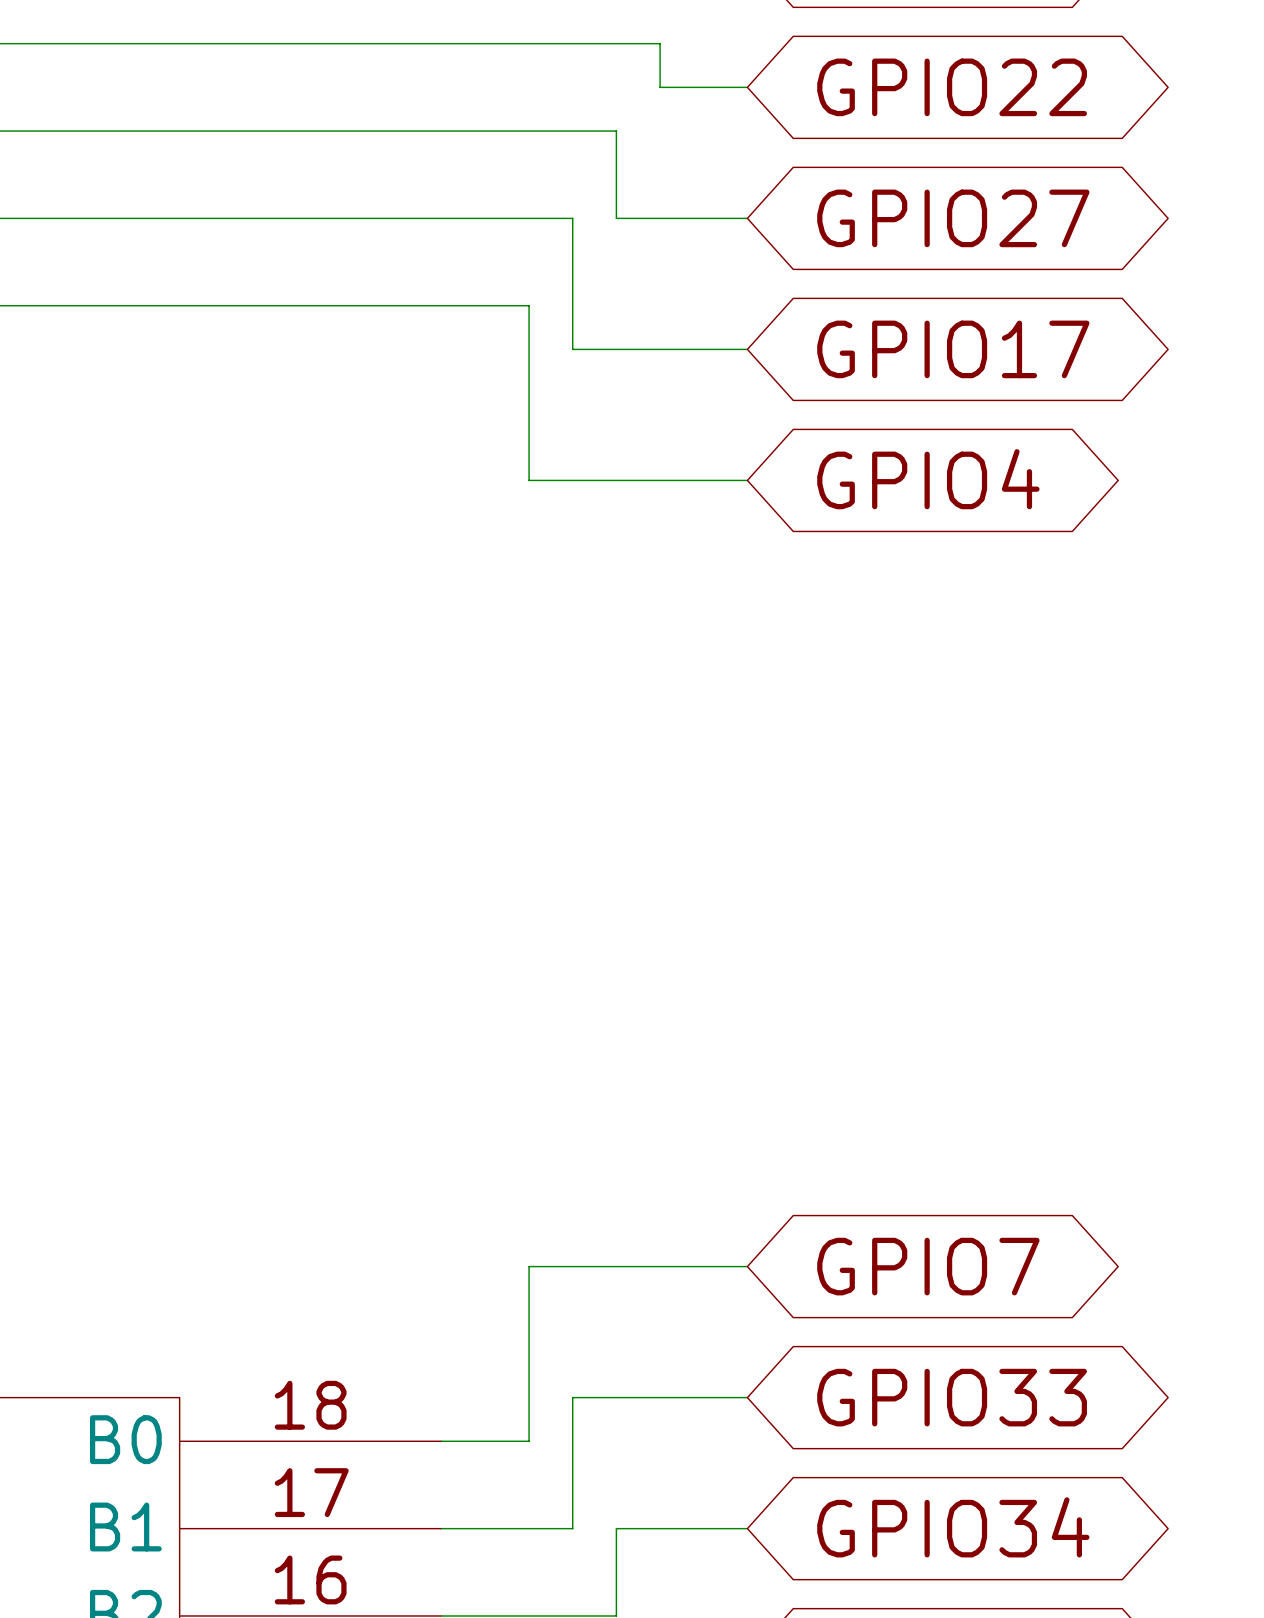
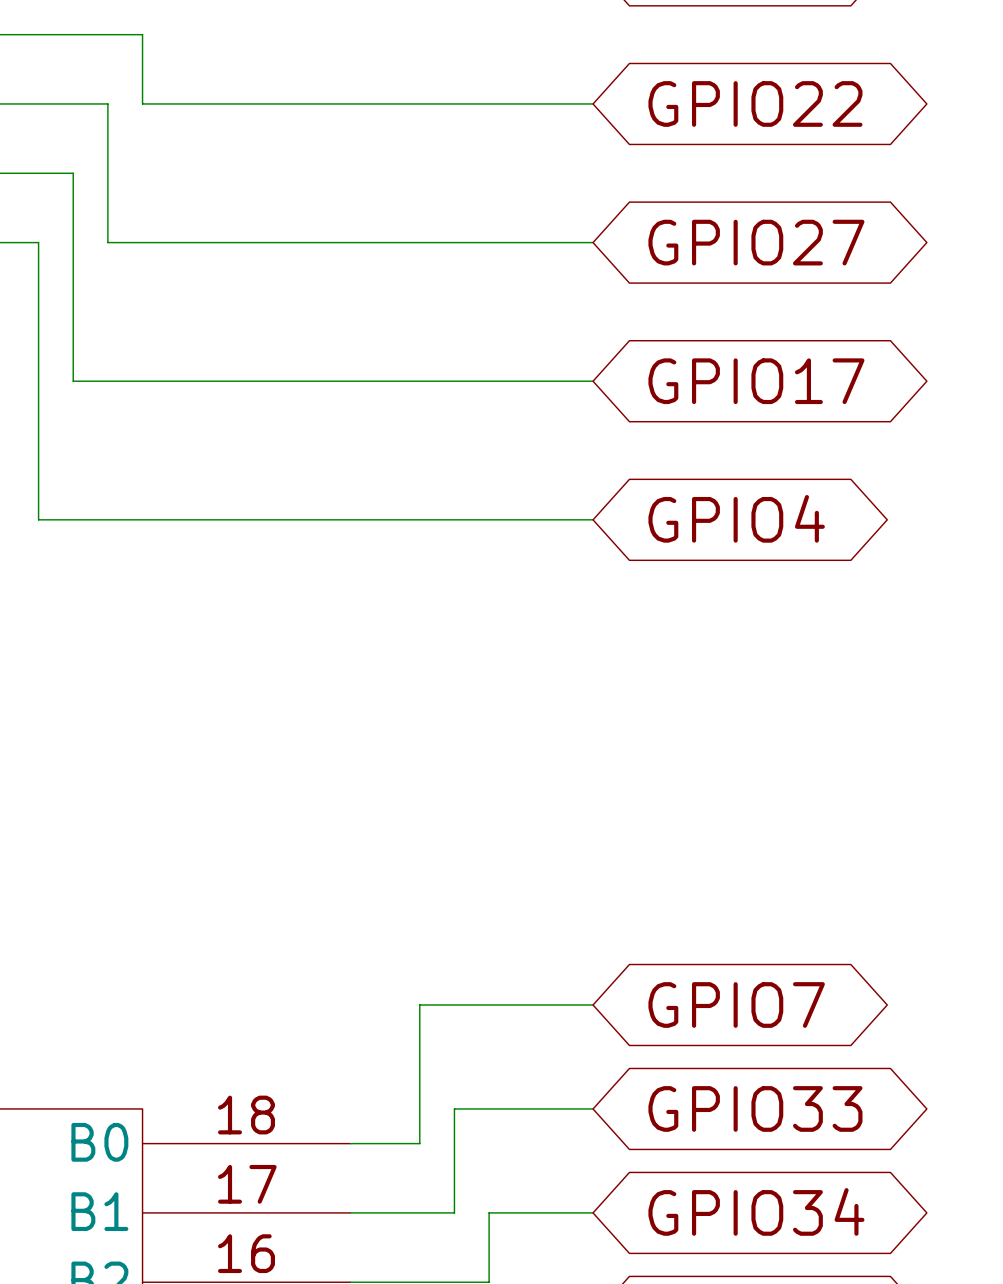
wire: (179, 43) (660, 43) (660, 87) (747, 87) -> none
global label position: GPIO22 (952, 87) -> GPIO22 (755, 103)
wire: (135, 131) (179, 131) -> (142, 34) (142, 103)
wire: (616, 131) (616, 218) (747, 218) -> (489, 103) (593, 103)
wire: (92, 218) (572, 218) (572, 349) (747, 349) -> (73, 173) (73, 381) (419, 381)
global label position: GPIO27 (953, 218) -> GPIO27 (756, 242)
wire: (48, 305) (135, 305) -> (107, 103) (107, 242)
wire: none -> (38, 242) (38, 519) (593, 519)
wire: (529, 305) (529, 480) -> (419, 242) (593, 242)
global label: GPIO17 (953, 349) -> none
global label: GPIO4 (928, 479) -> GPIO17 (756, 381)
global label: none -> GPIO4 (736, 518)

